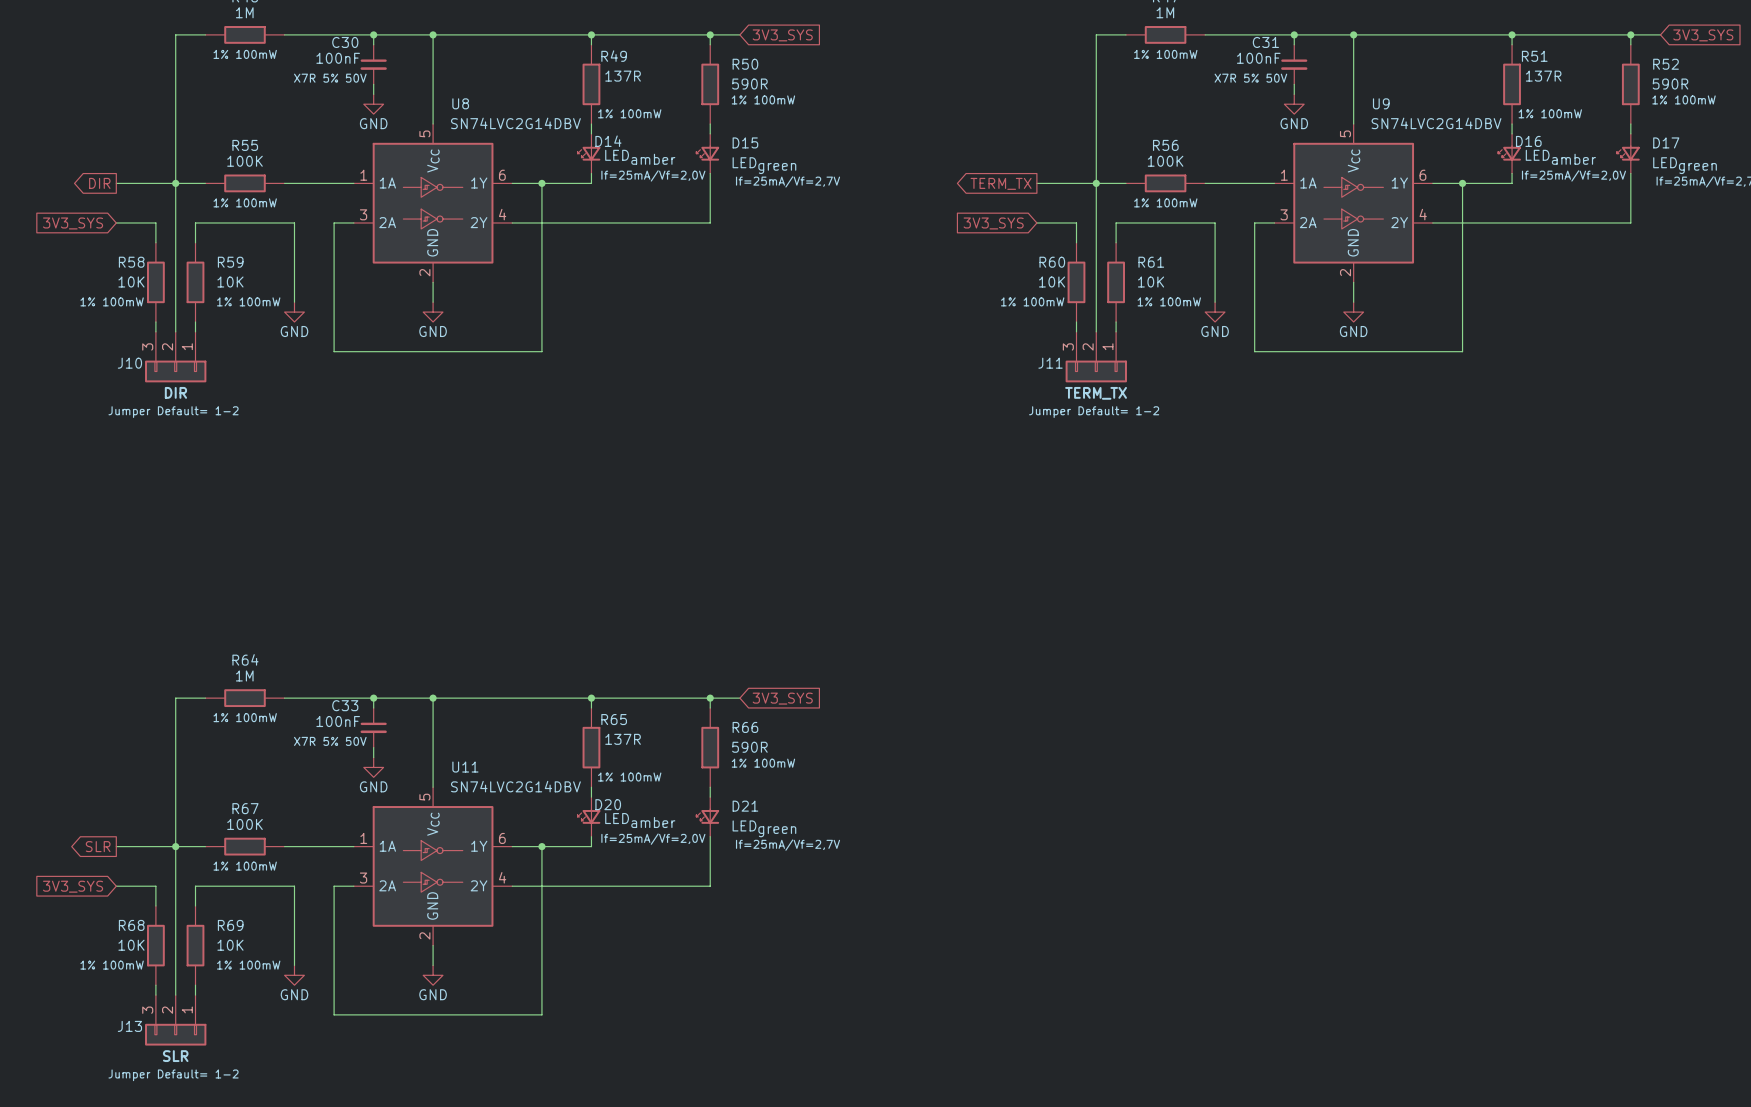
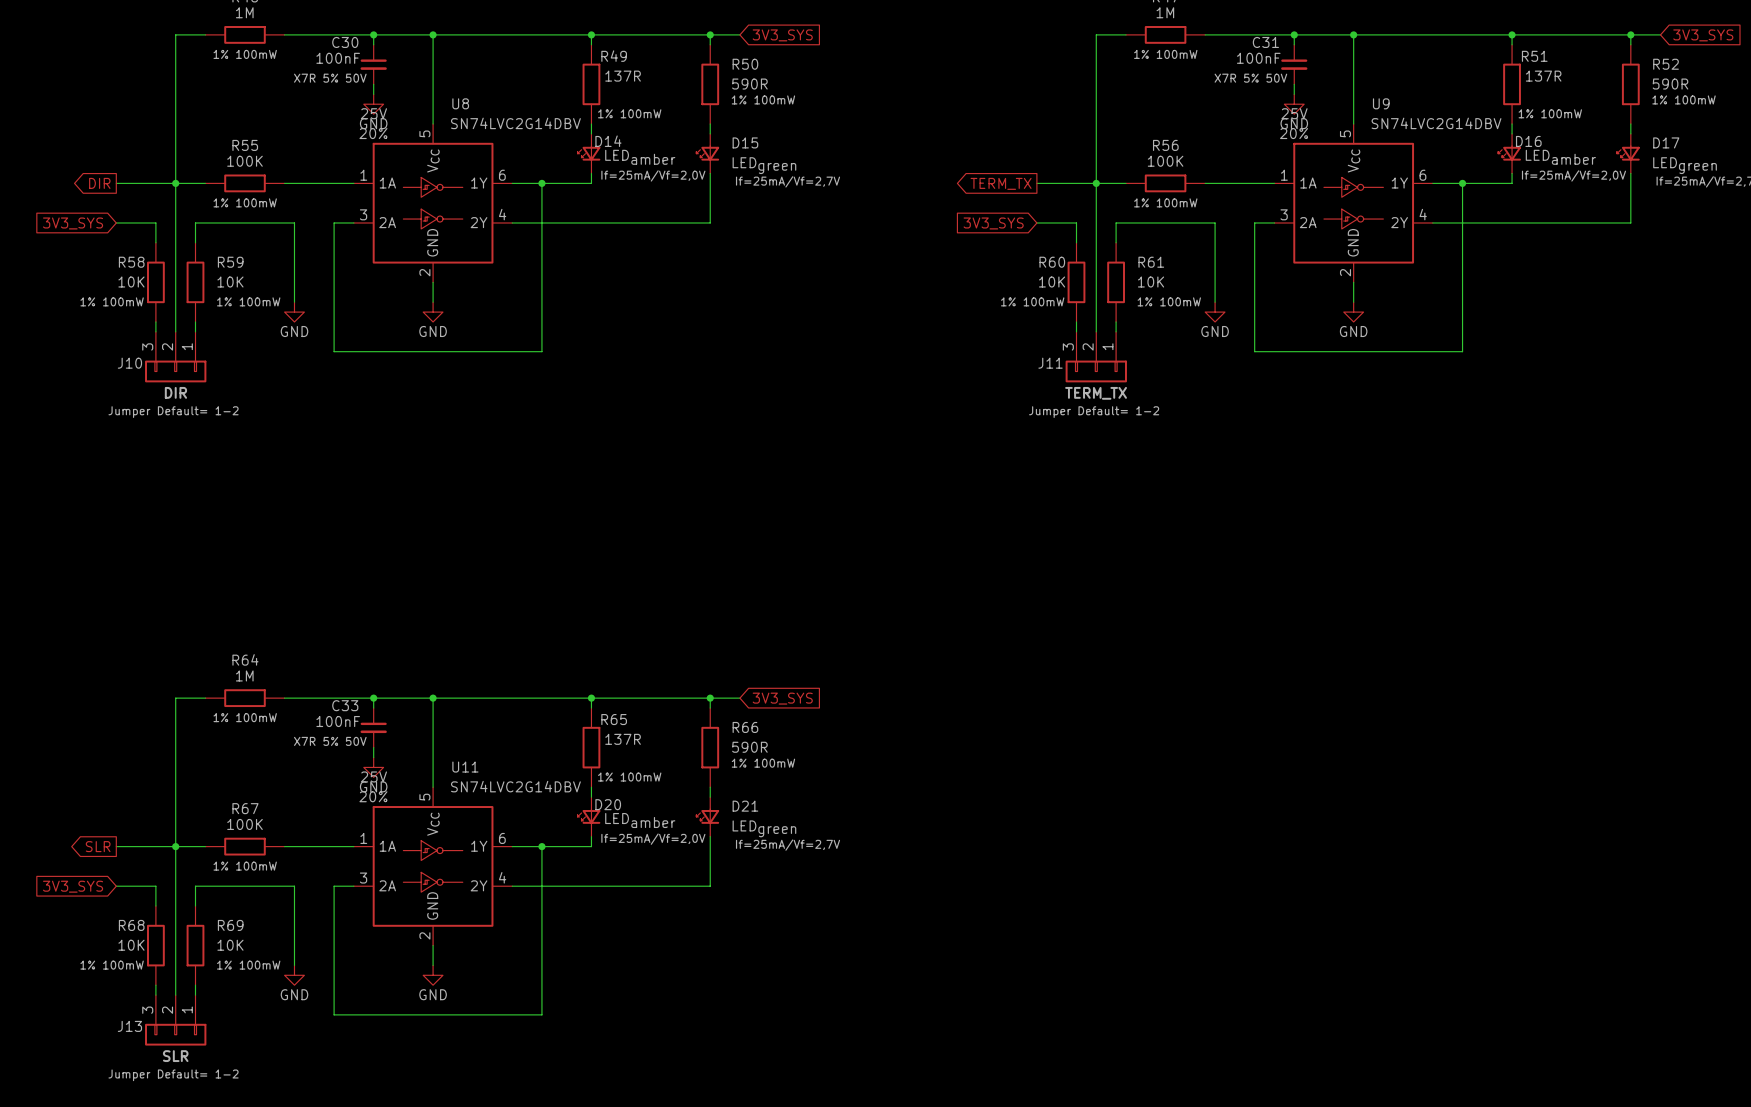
C30 text: none -> 25V (373, 113)
C31 text: none -> 25V (1294, 113)
C30 text: none -> 20% (373, 133)
C31 text: none -> 20% (1294, 133)
C33 text: none -> 25V (373, 776)
C33 text: none -> 20% (373, 796)

